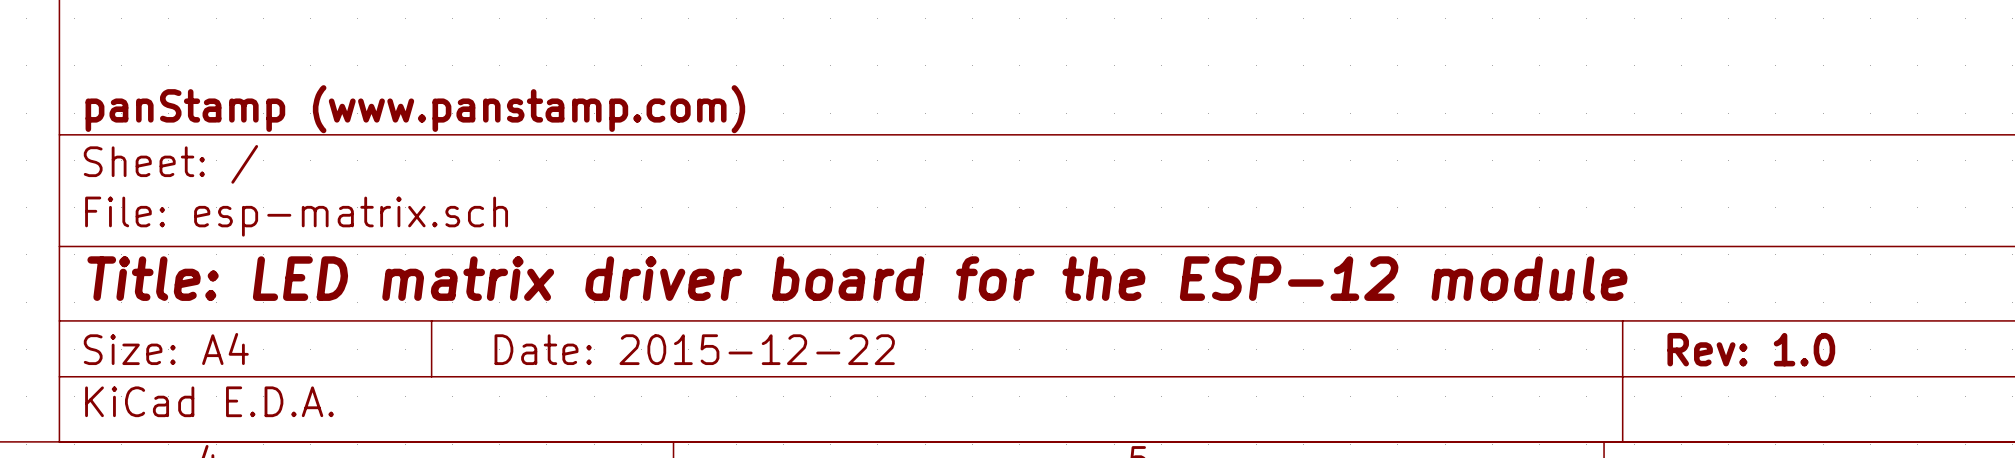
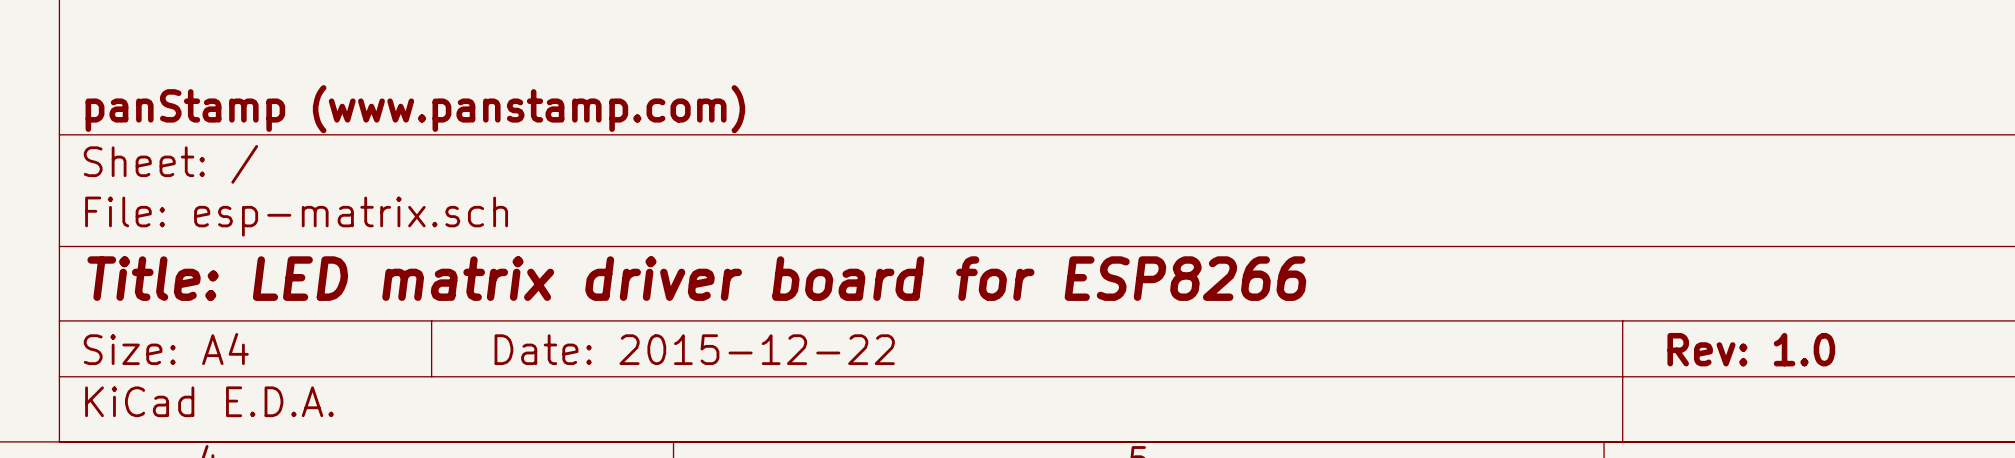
title block: Title: LED matrix driver board for the ESP-12 module (857, 278) -> Title: LED matrix driver board for ESP8266 (696, 278)

